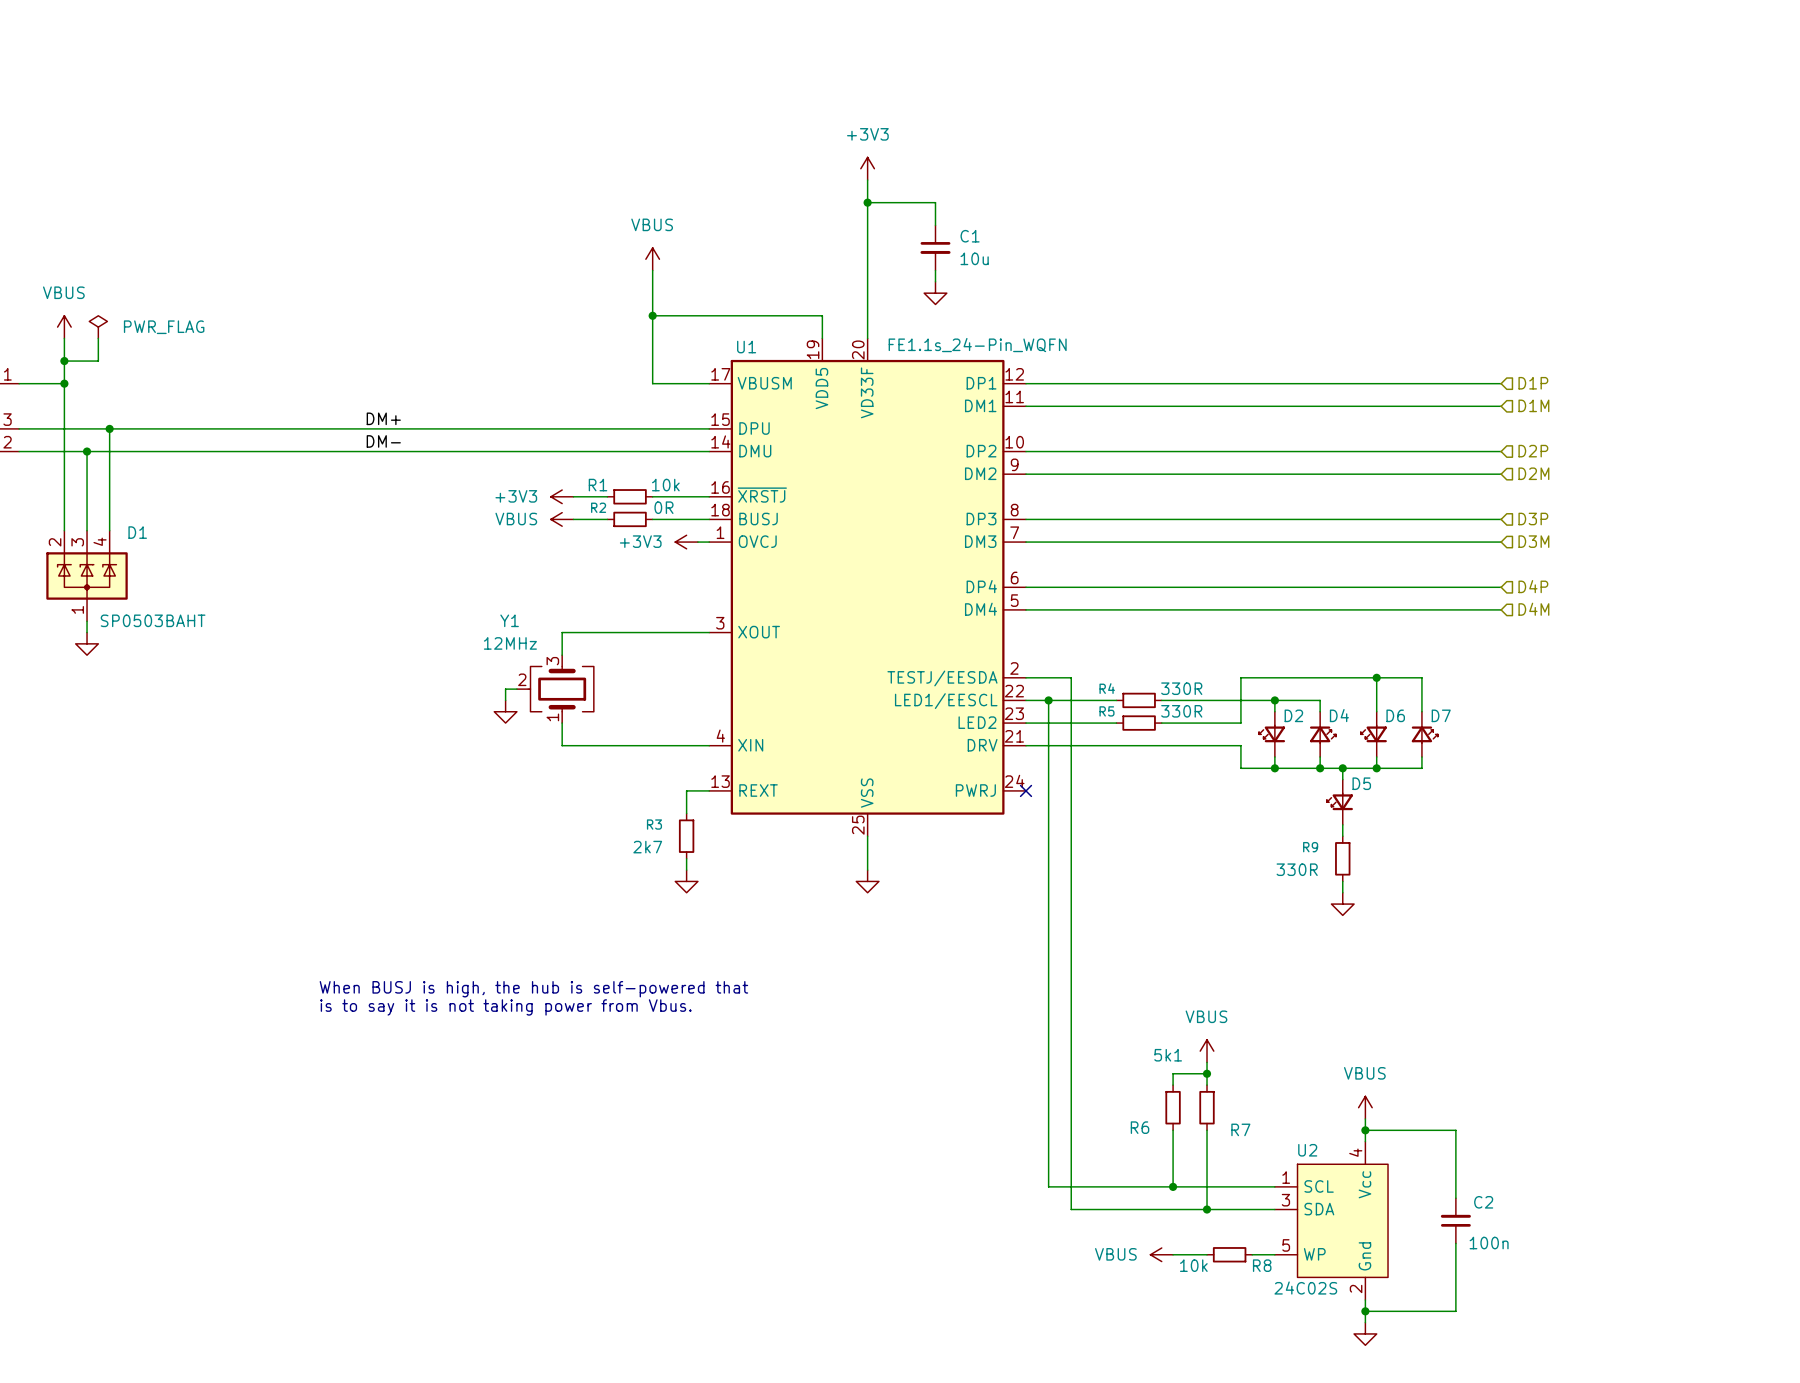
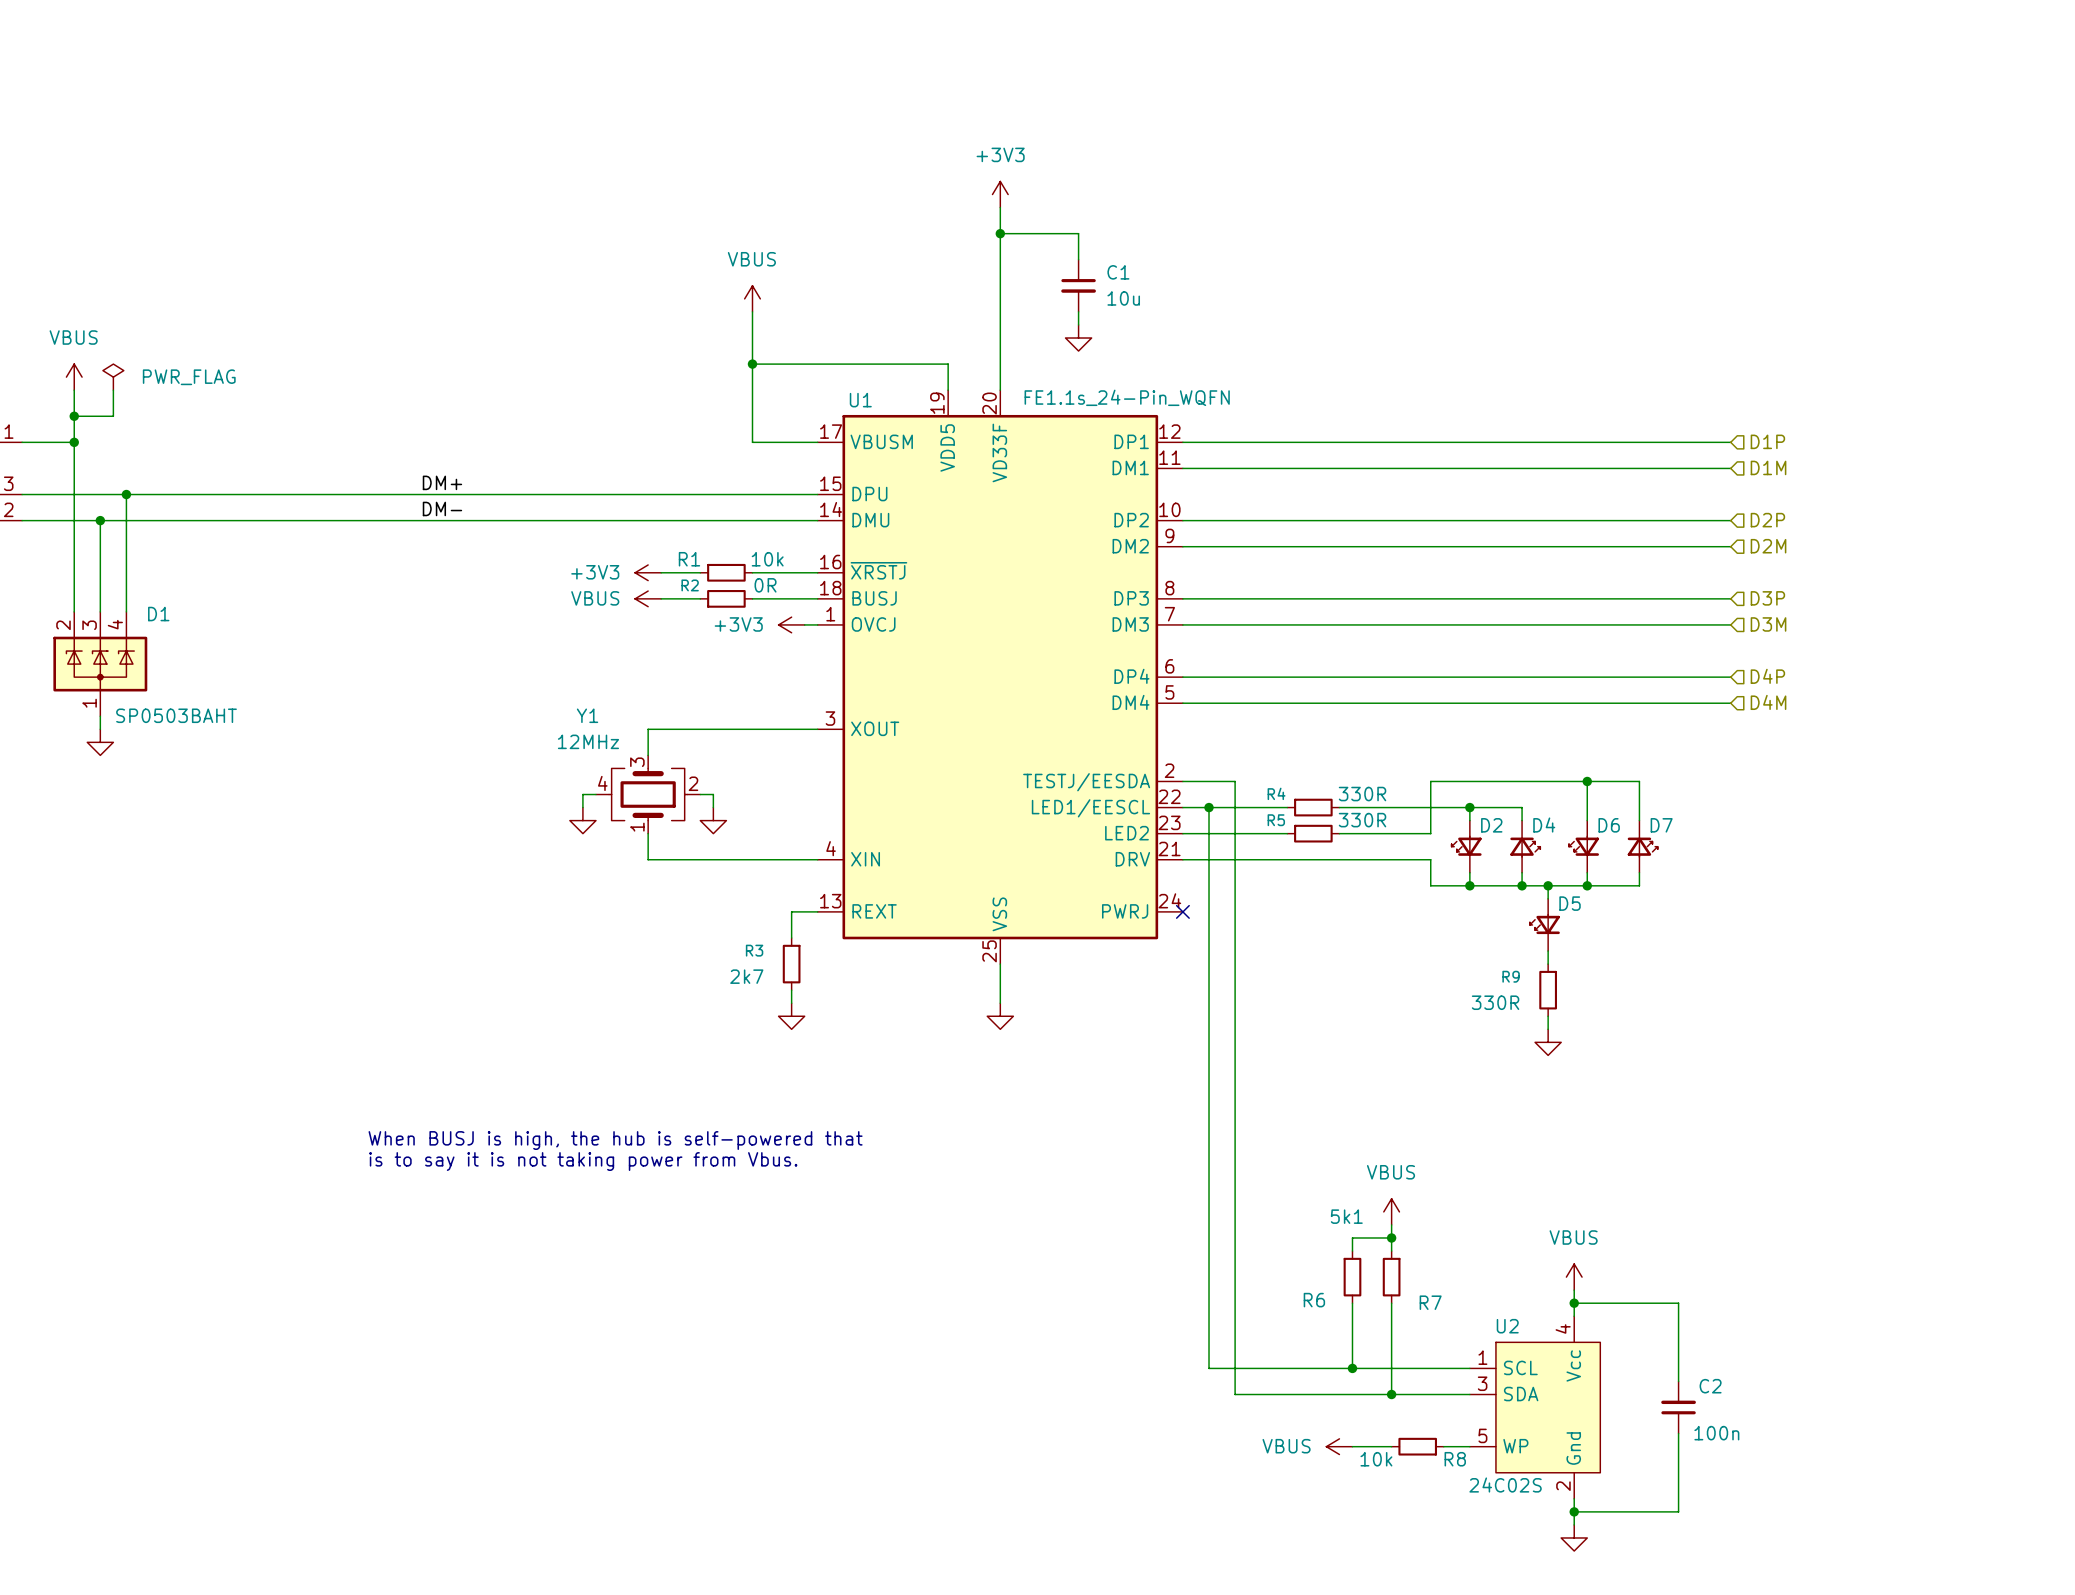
Y1 symbol: [516, 655, 594, 724] -> [595, 755, 701, 834]
wire: none -> (700, 794) (713, 794) (713, 807)
power symbol: none -> (713, 820)

